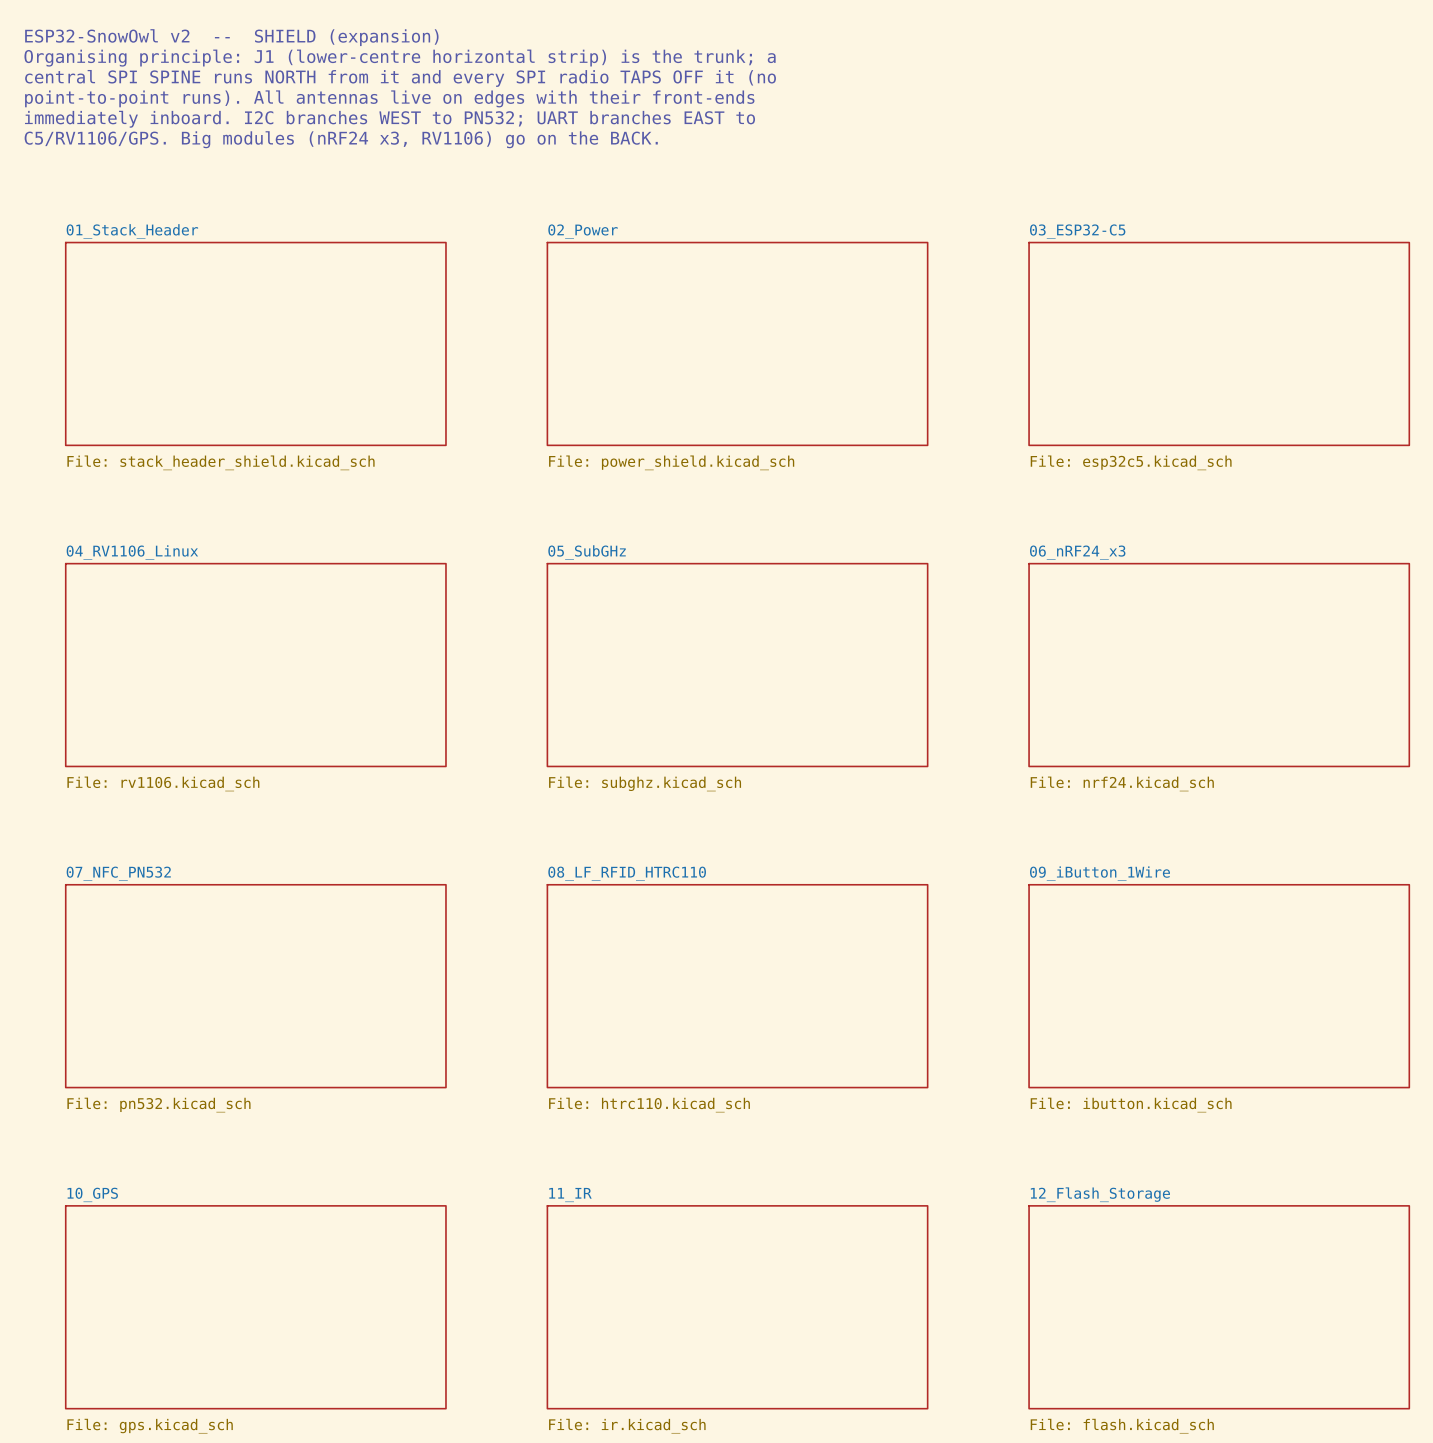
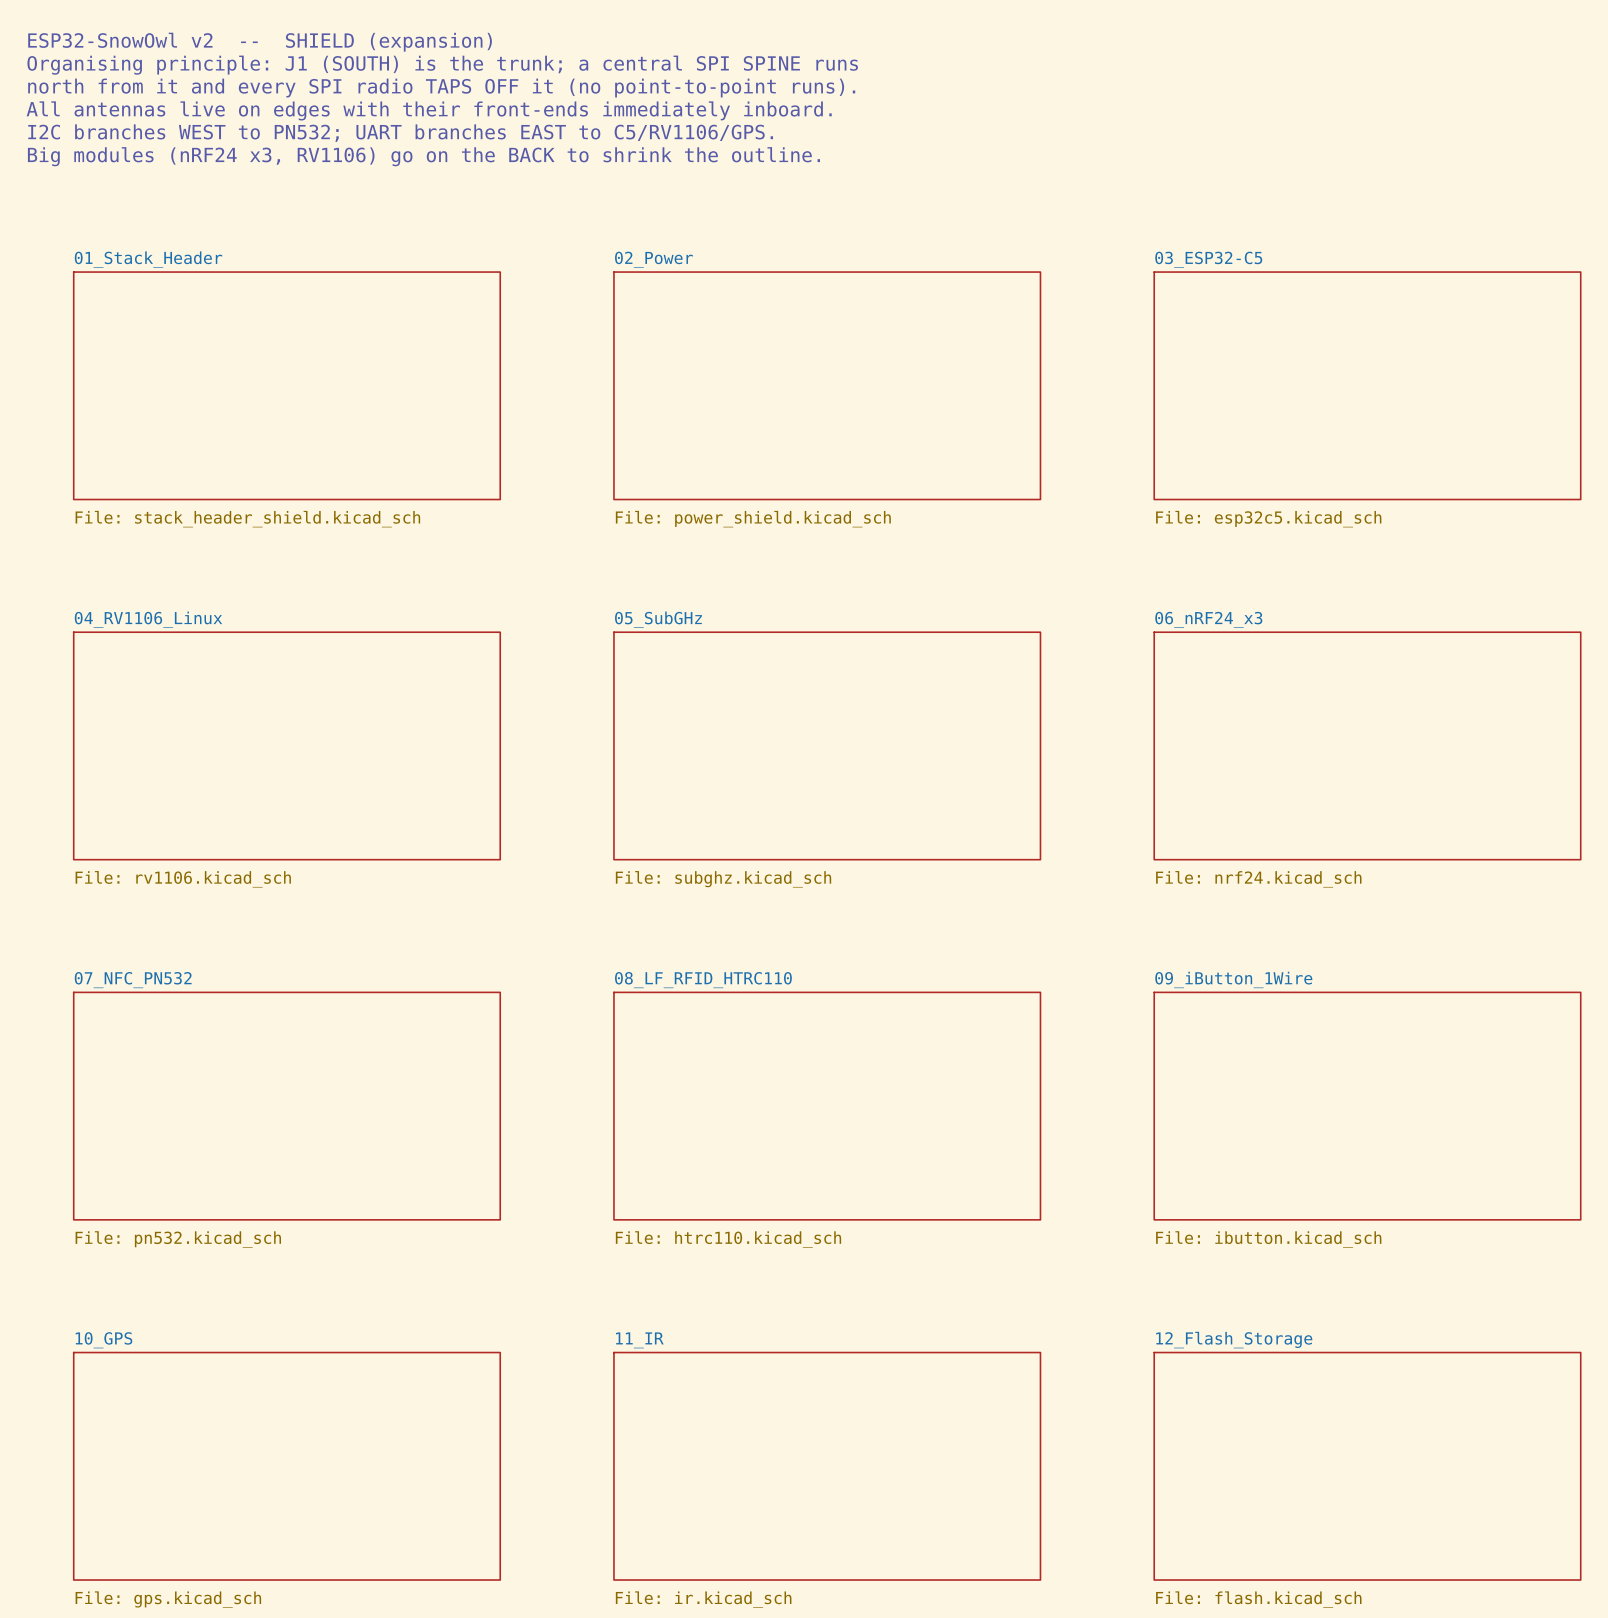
text: Organising principle: J1 (lower-centre horizontal strip) is the trunk; a (400, 58) -> Organising principle: J1 (SOUTH) is the trunk; a central SPI SPINE runs (442, 65)
text: central SPI SPINE runs NORTH from it and every SPI radio TAPS OFF it (no (400, 78) -> north from it and every SPI radio TAPS OFF it (no point-to-point runs). (441, 88)
text: point-to-point runs). All antennas live on edges with their front-ends (389, 98) -> All antennas live on edges with their front-ends immediately inboard. (429, 110)
text: immediately inboard. I2C branches WEST to PN532; UART branches EAST to (390, 119) -> I2C branches WEST to PN532; UART branches EAST to C5/RV1106/GPS. (400, 133)
text: C5/RV1106/GPS. Big modules (nRF24 x3, RV1106) go on the BACK. (341, 139) -> Big modules (nRF24 x3, RV1106) go on the BACK to shrink the outline. (423, 156)

